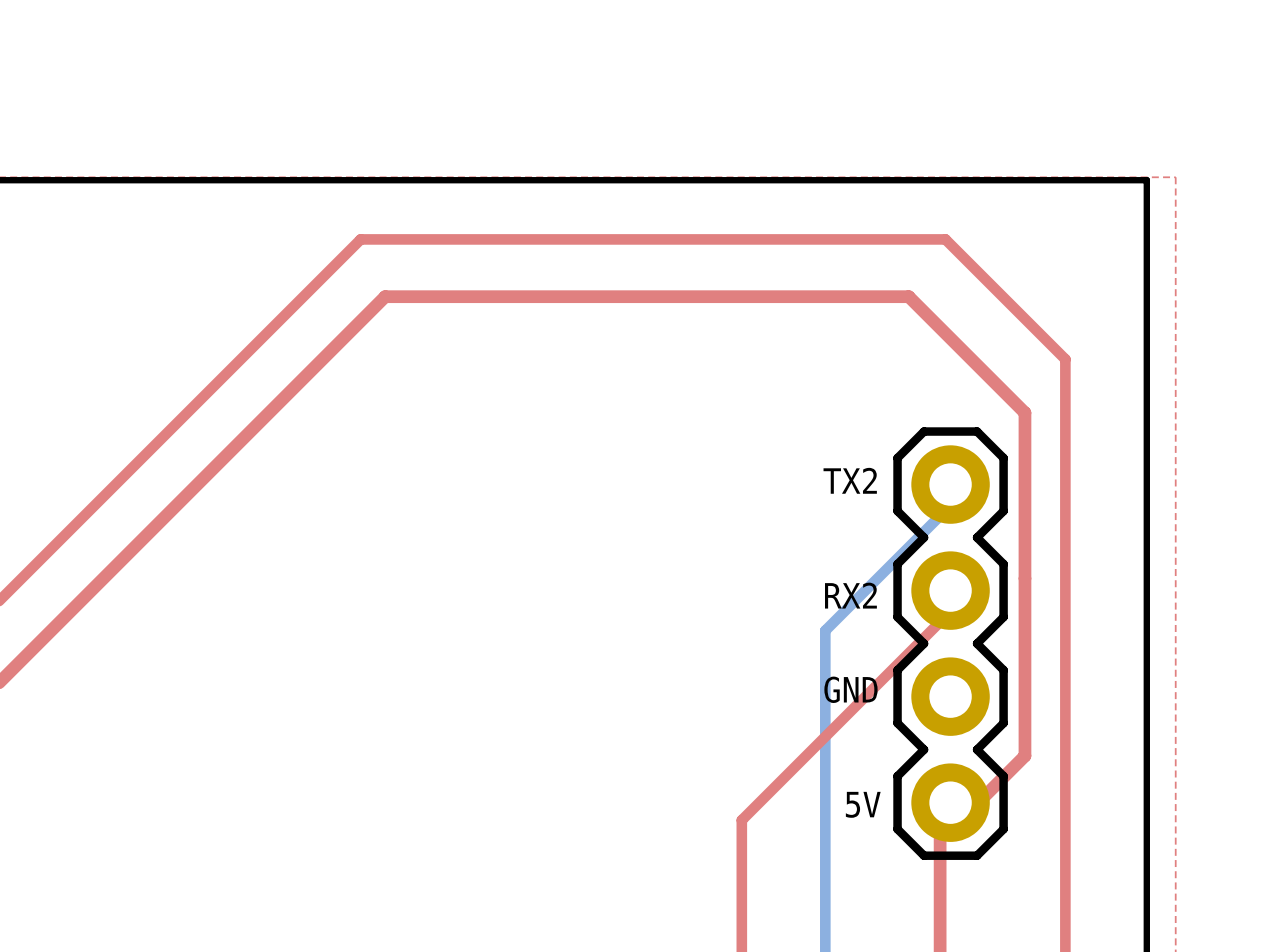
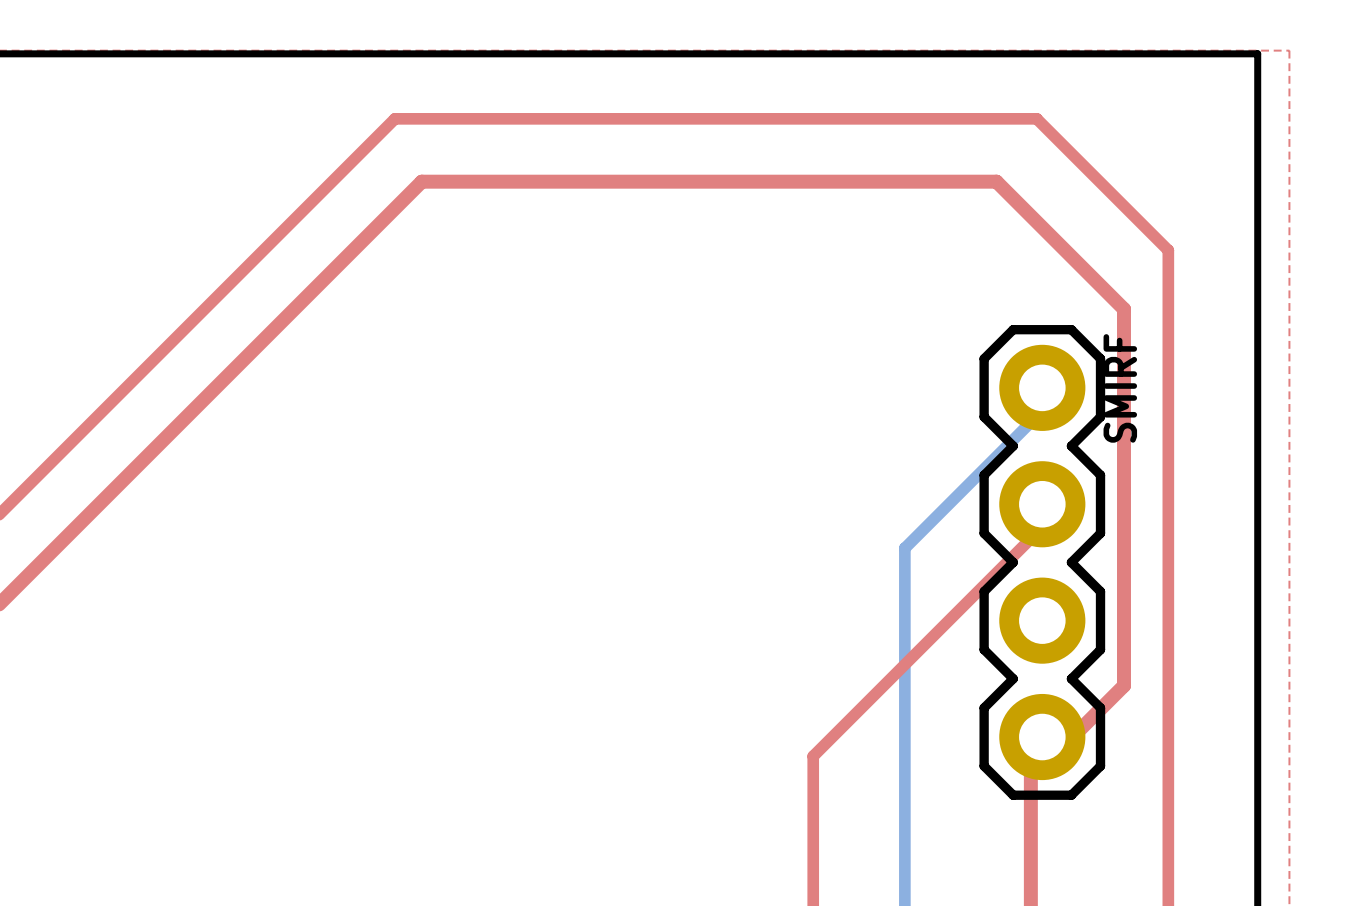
SMIRF name: none -> SMIRF (1120, 388)
text: TX2 (850, 480) -> none
text: RX2 (850, 595) -> none
text: GND (850, 689) -> none
text: 5V (863, 804) -> none

